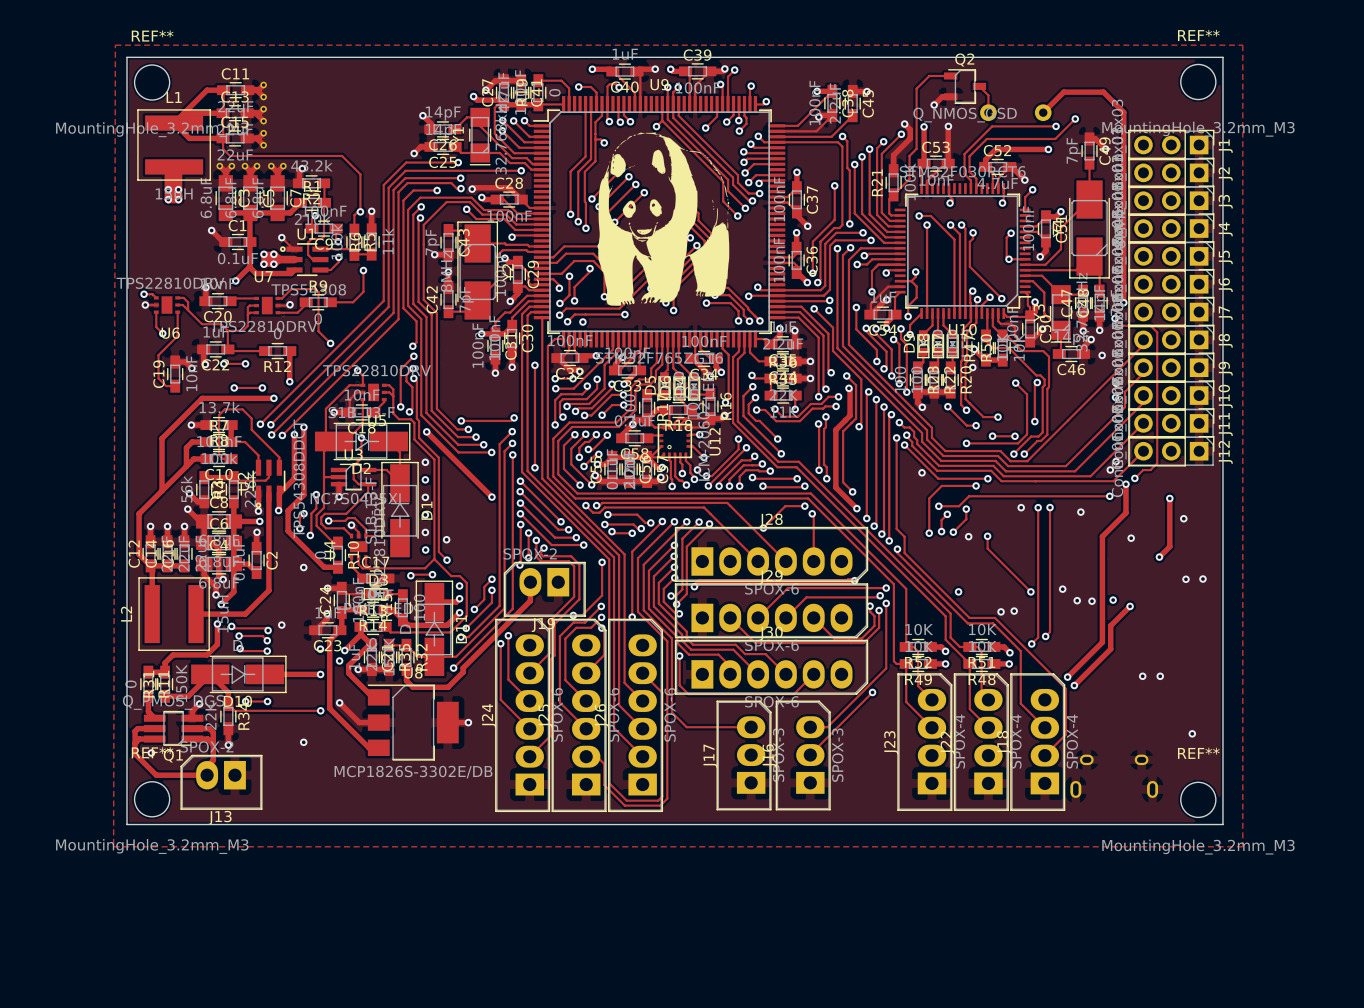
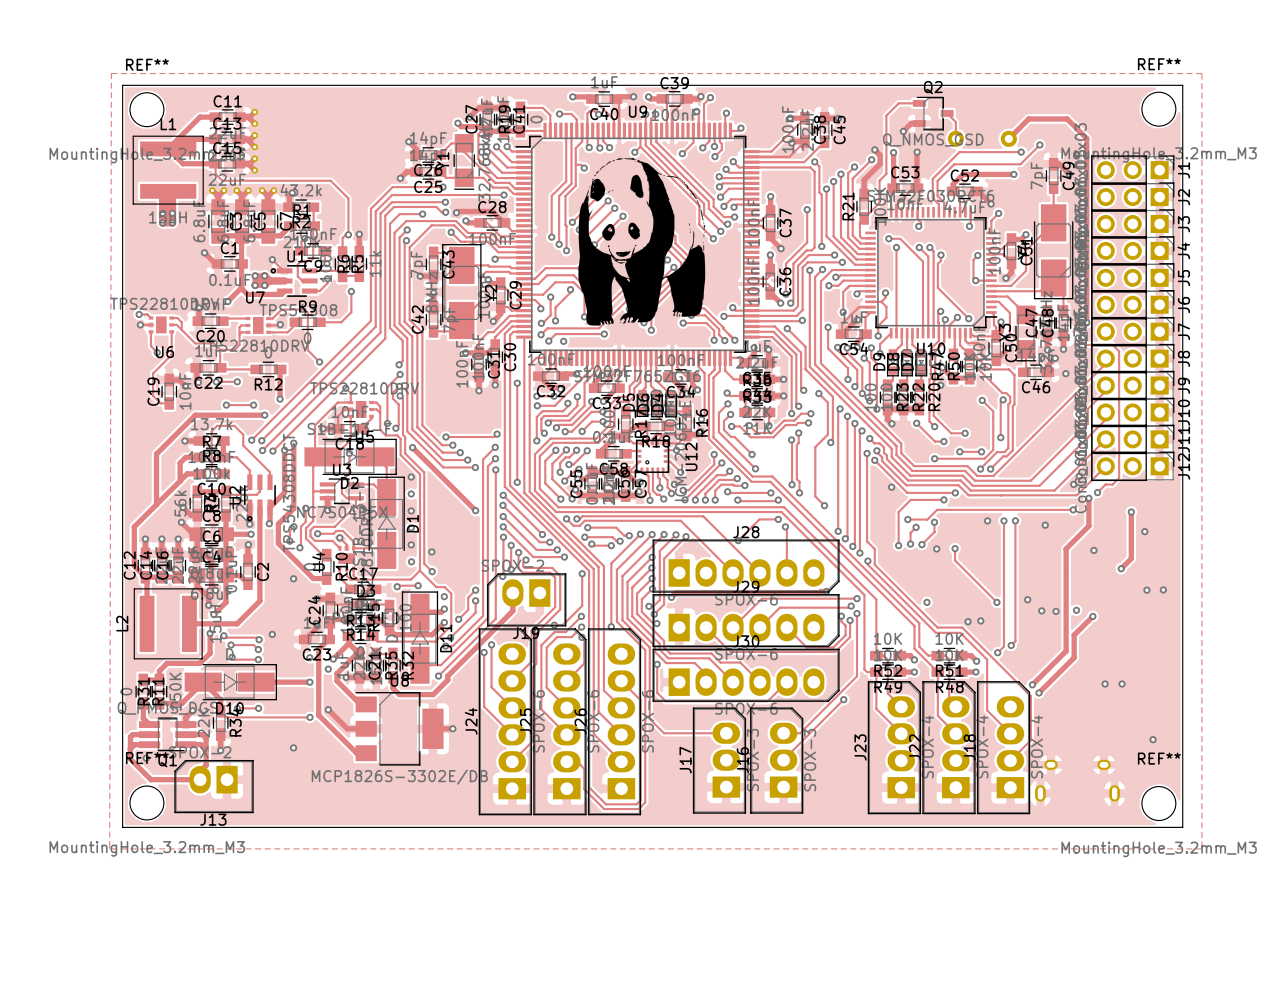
via: (828, 310) -> none
track: (848, 388) (850, 415) (835, 429) (835, 487) (856, 508) -> none
via: (848, 388) -> none
via: (856, 508) -> none

